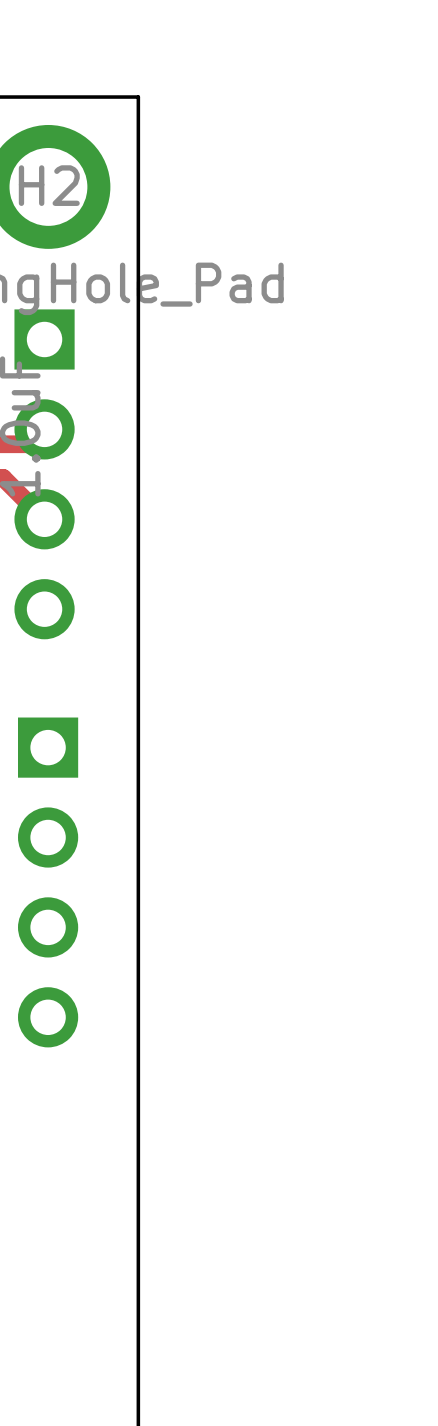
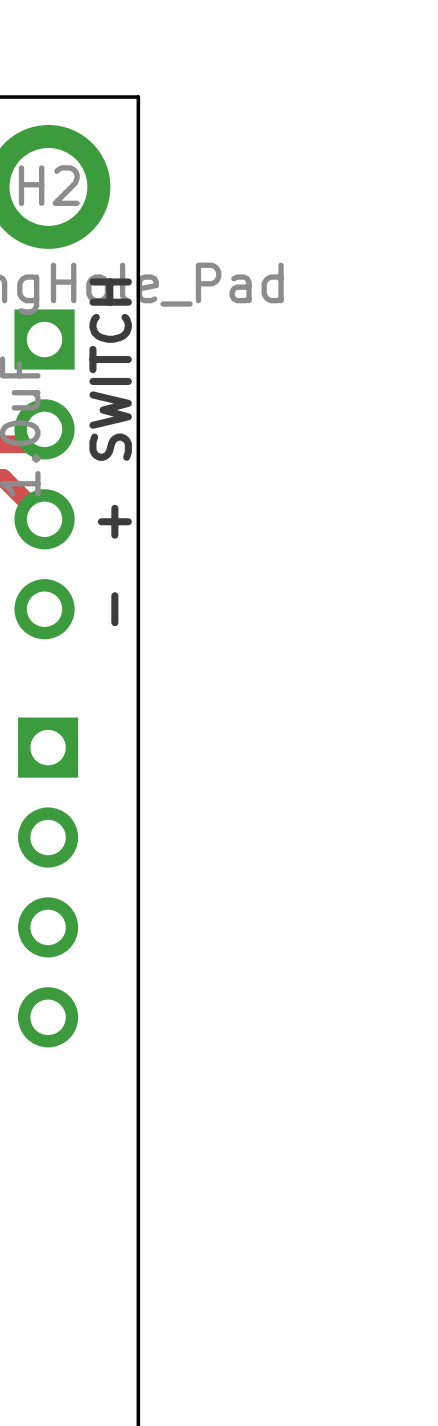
text: none -> SWITCH (110, 369)
text: none -> + (114, 521)
text: none -> - (114, 609)

